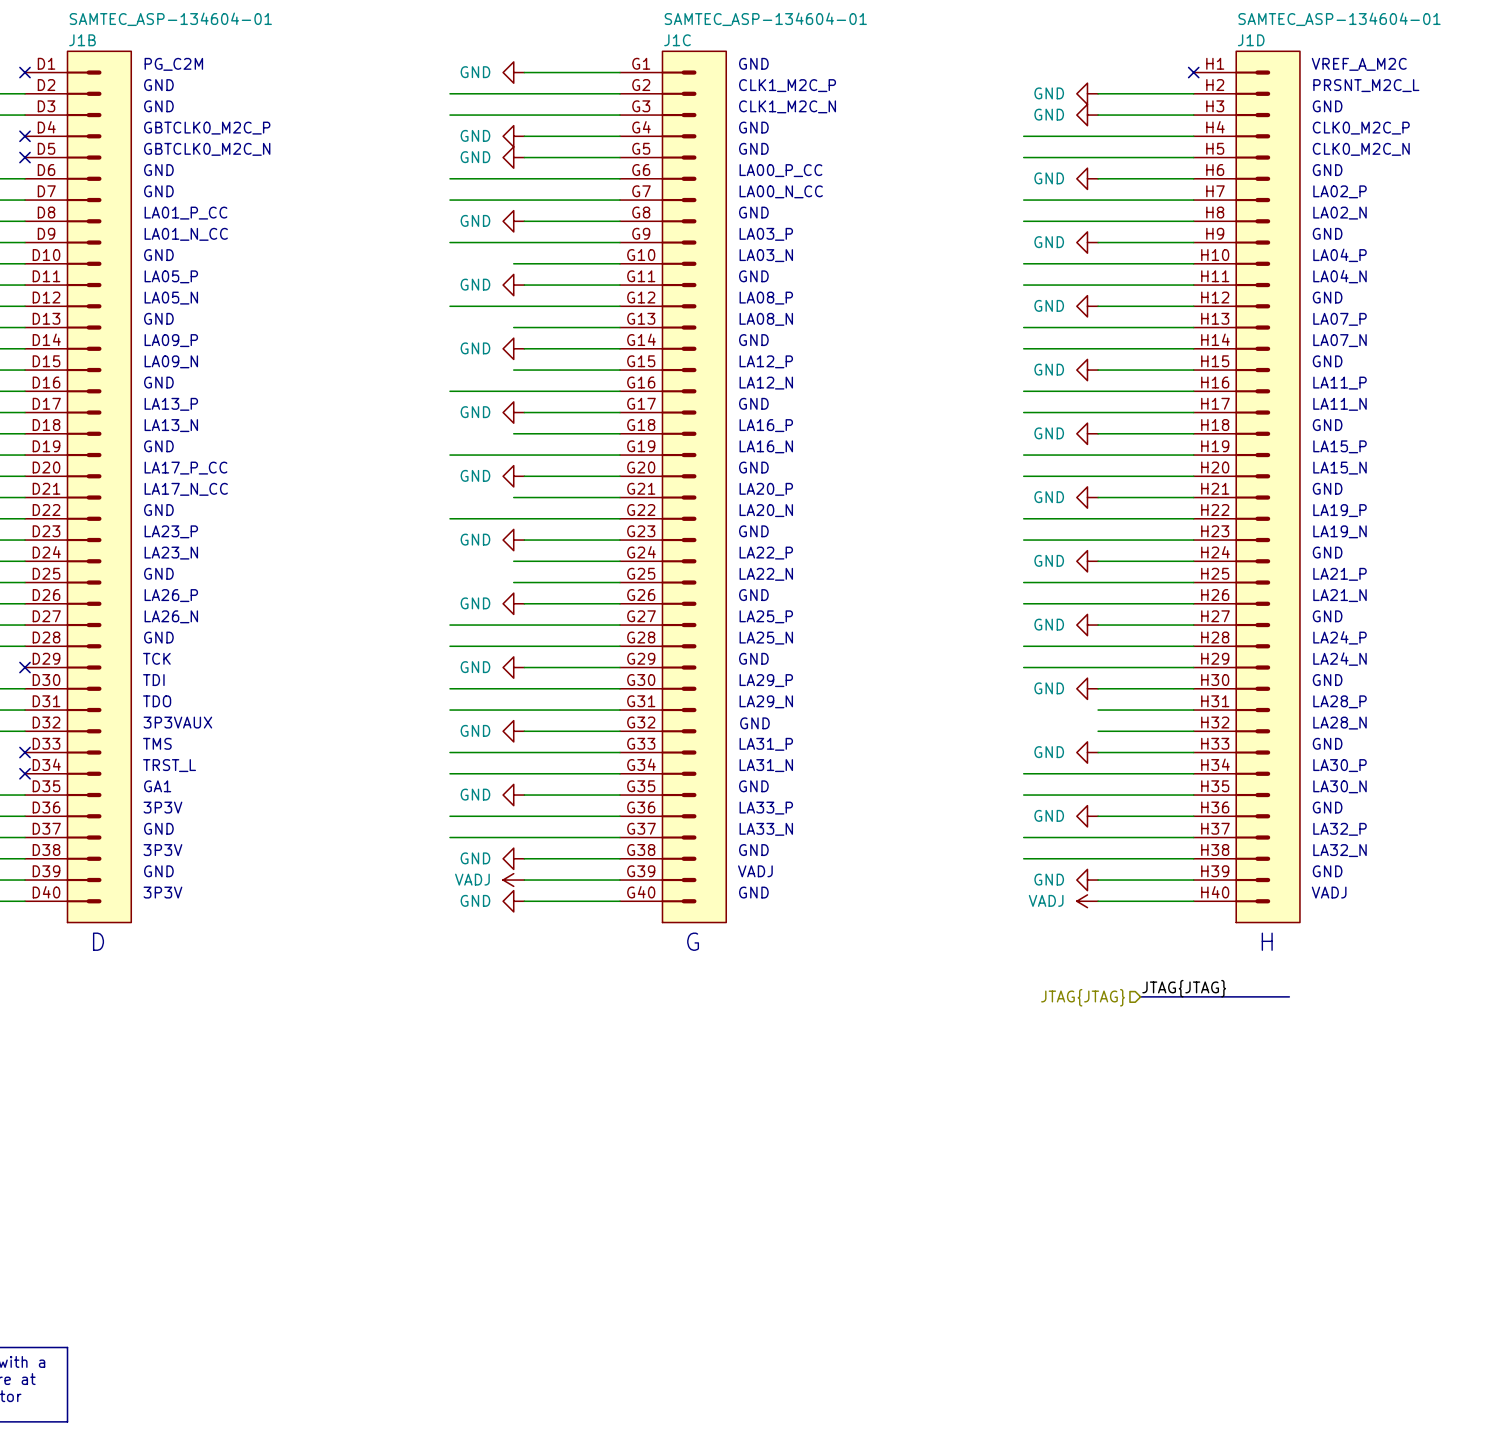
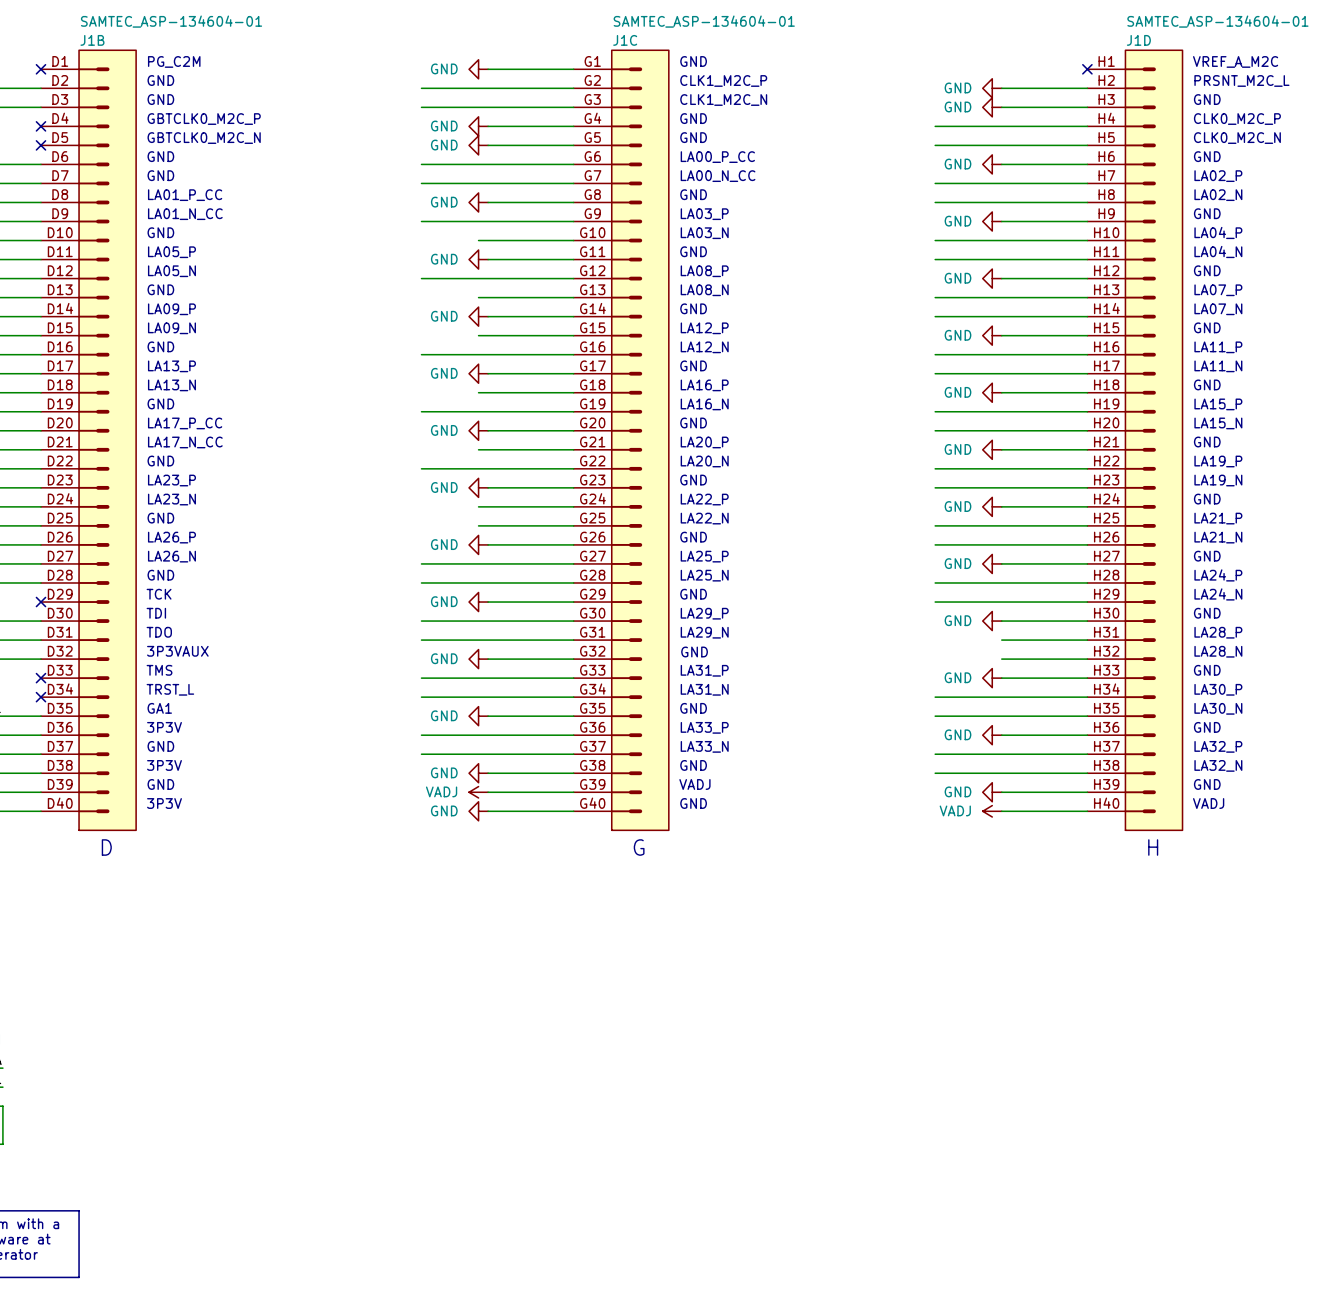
label: JTAG{JTAG} (1184, 988) -> none
bus: (1140, 996) (1289, 996) -> none
hierarchical label: JTAG{JTAG} (1083, 997) -> none

